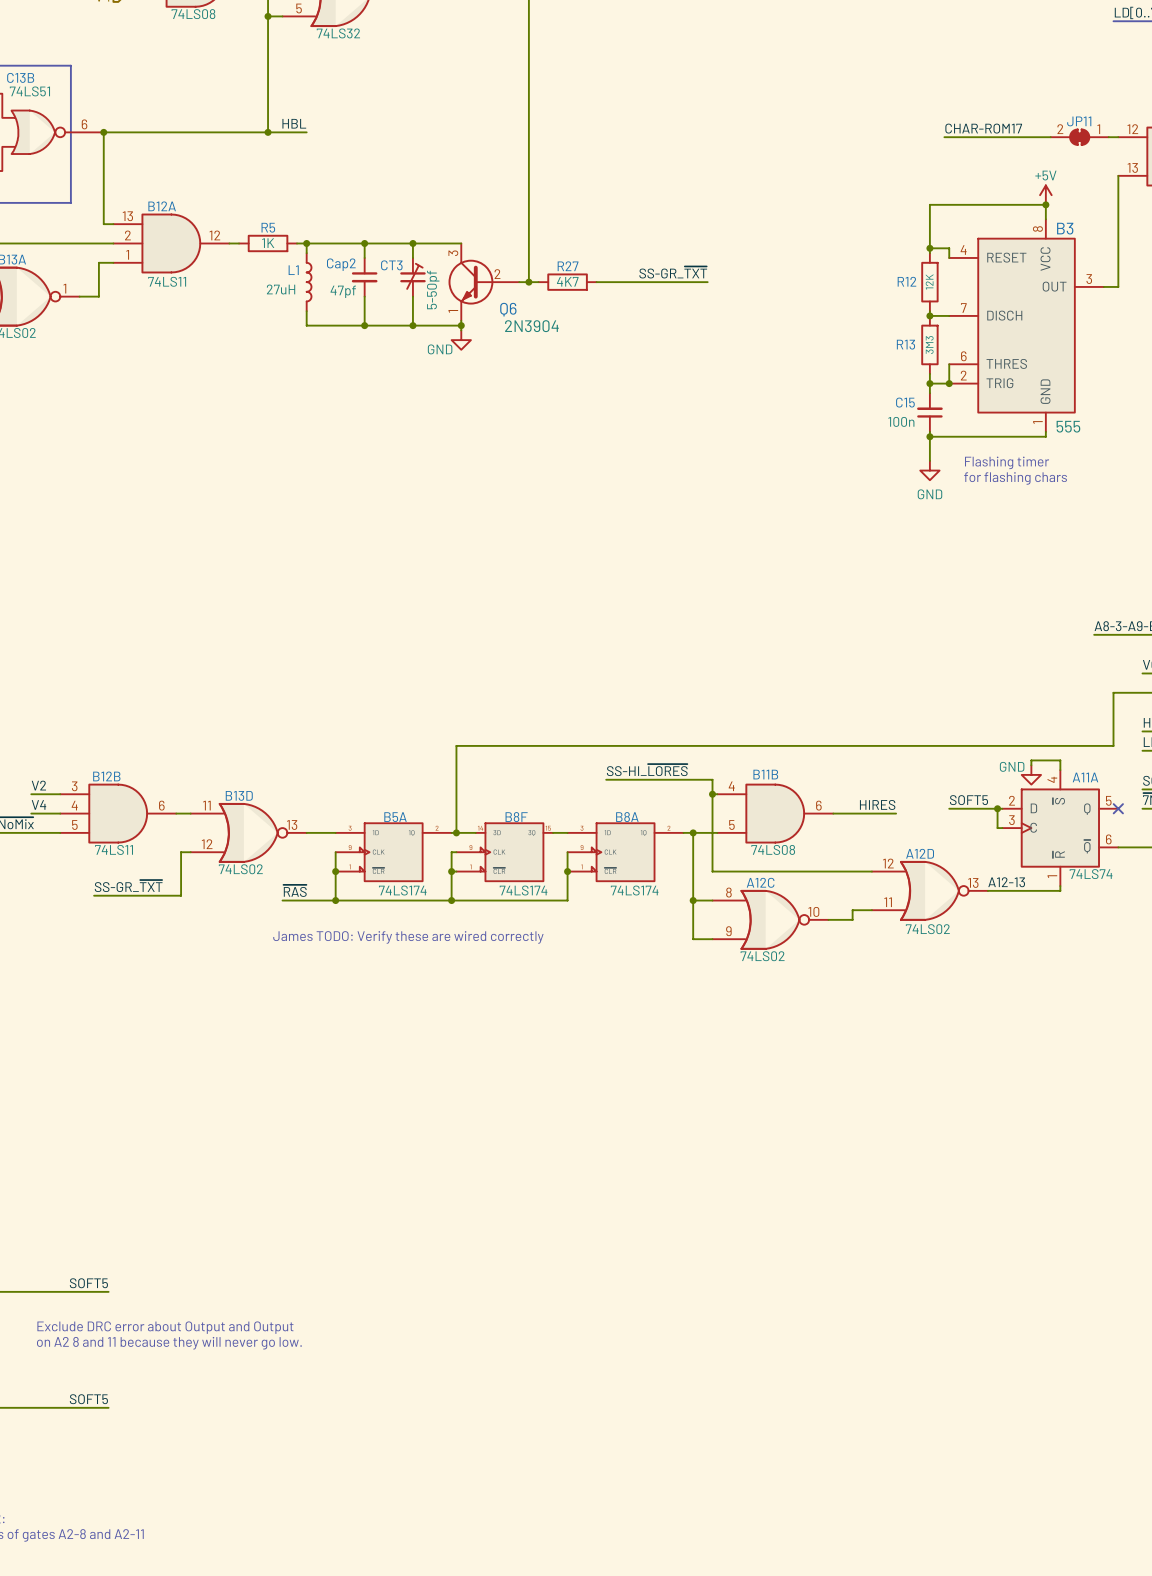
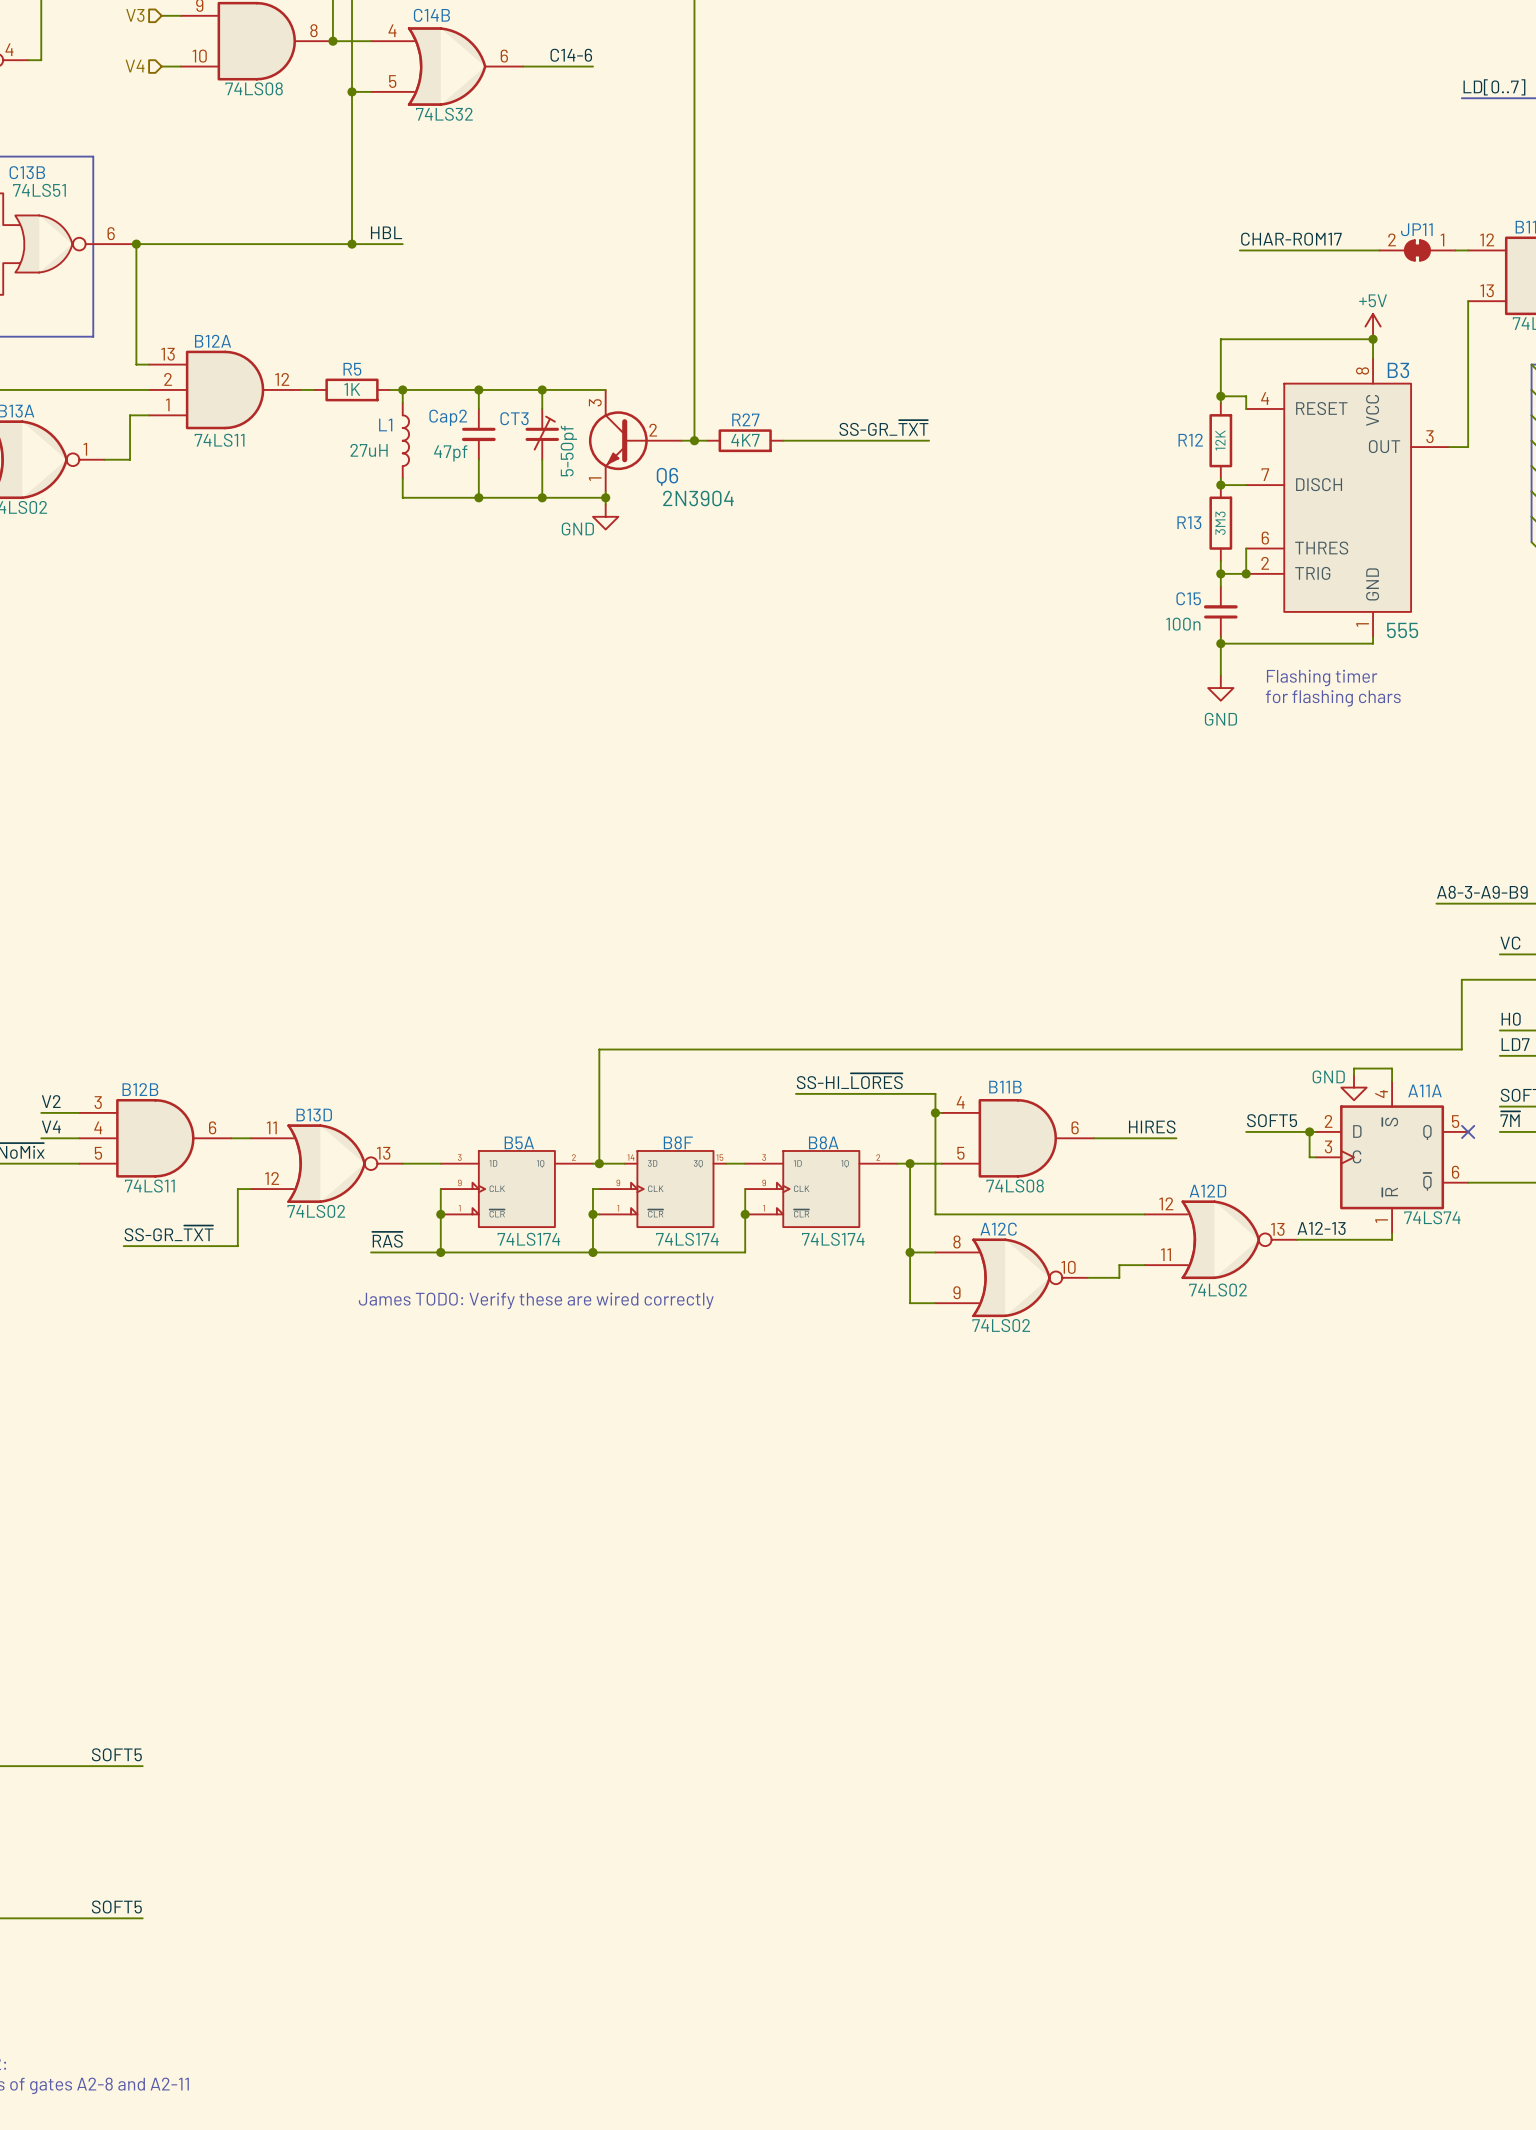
text: Exclude DRC error about Output and Output (165, 1327) -> none
text: on A2 8 and 11 because they will never go low. (169, 1343) -> none

